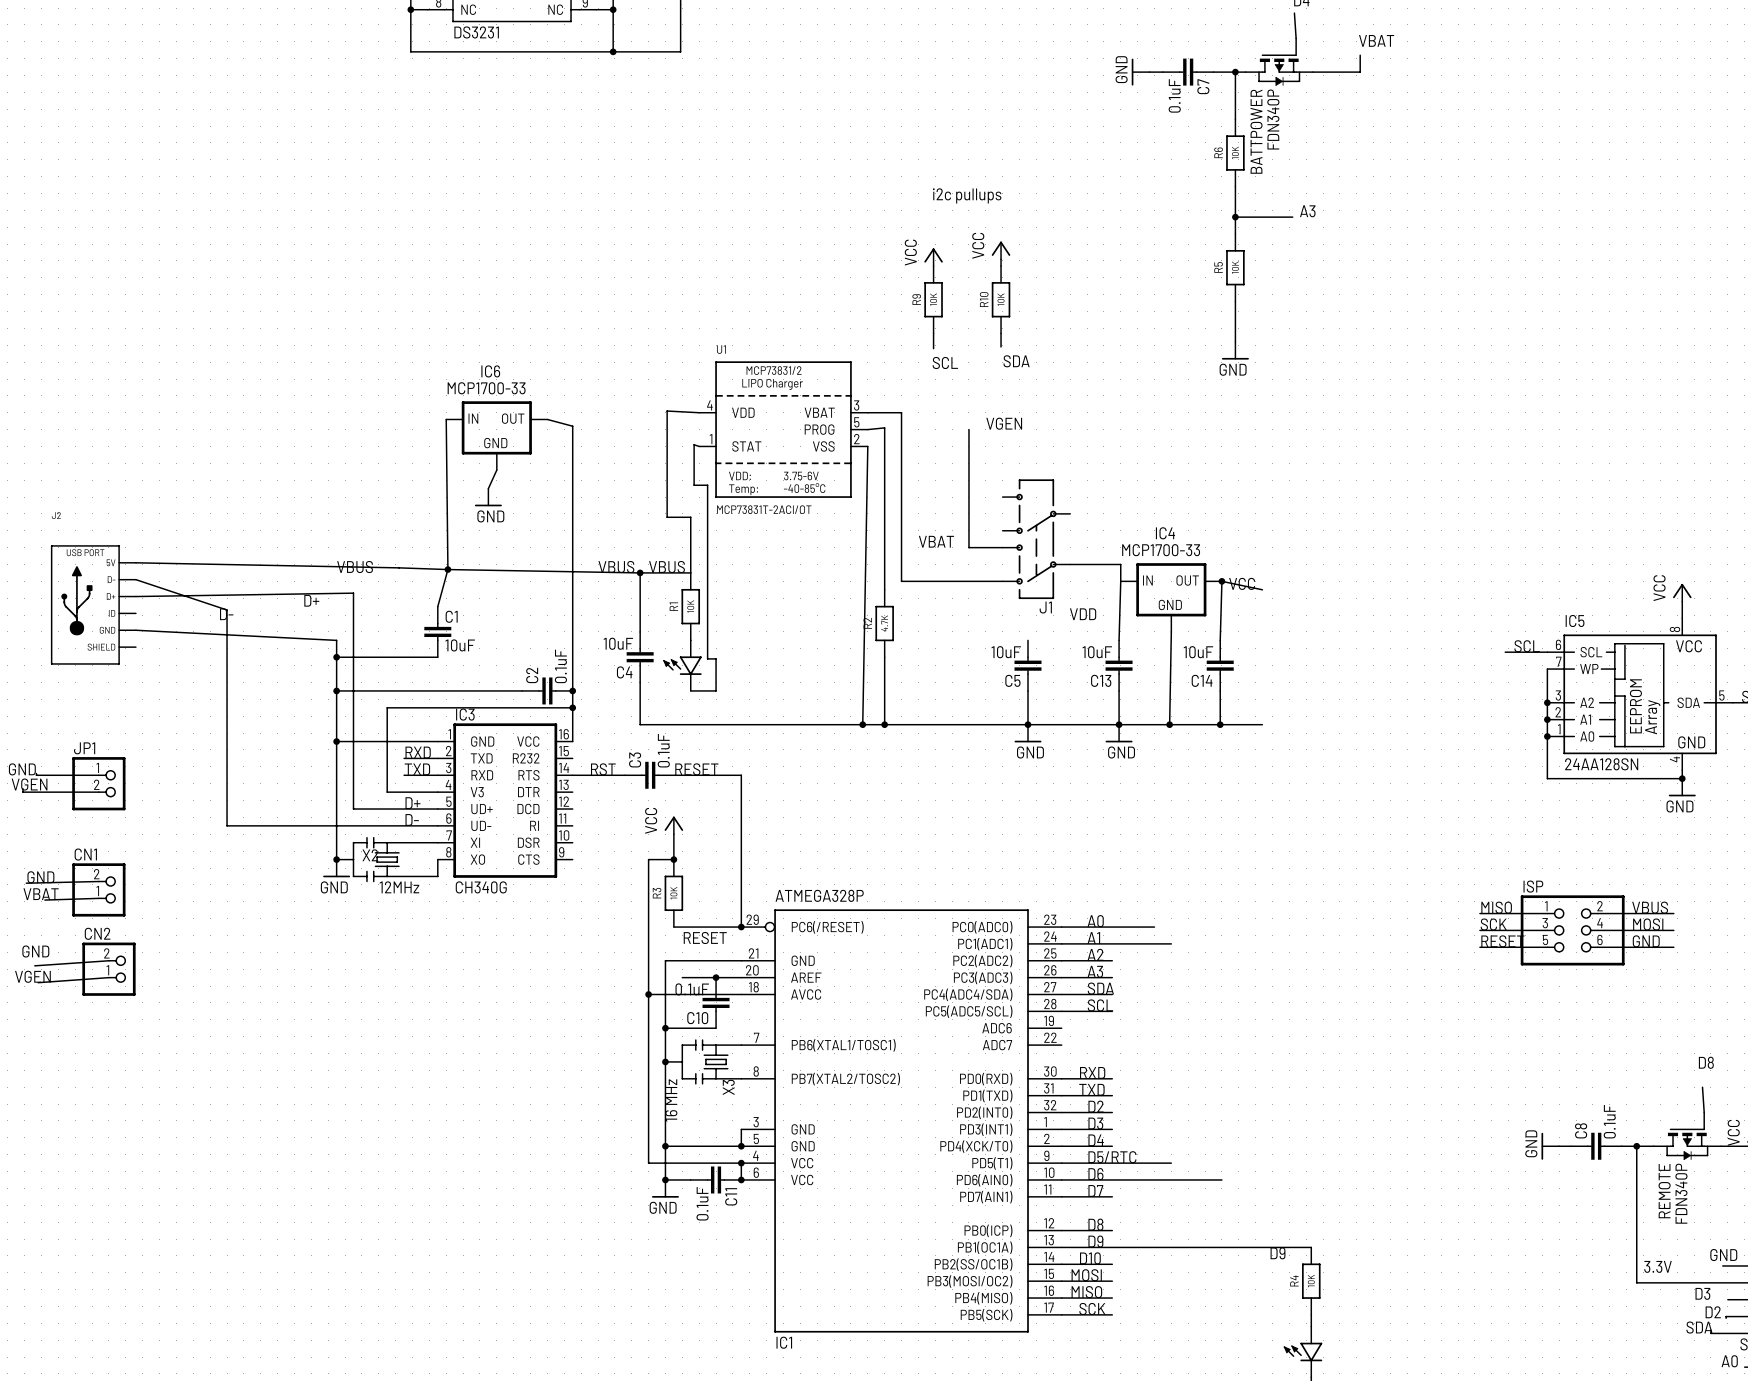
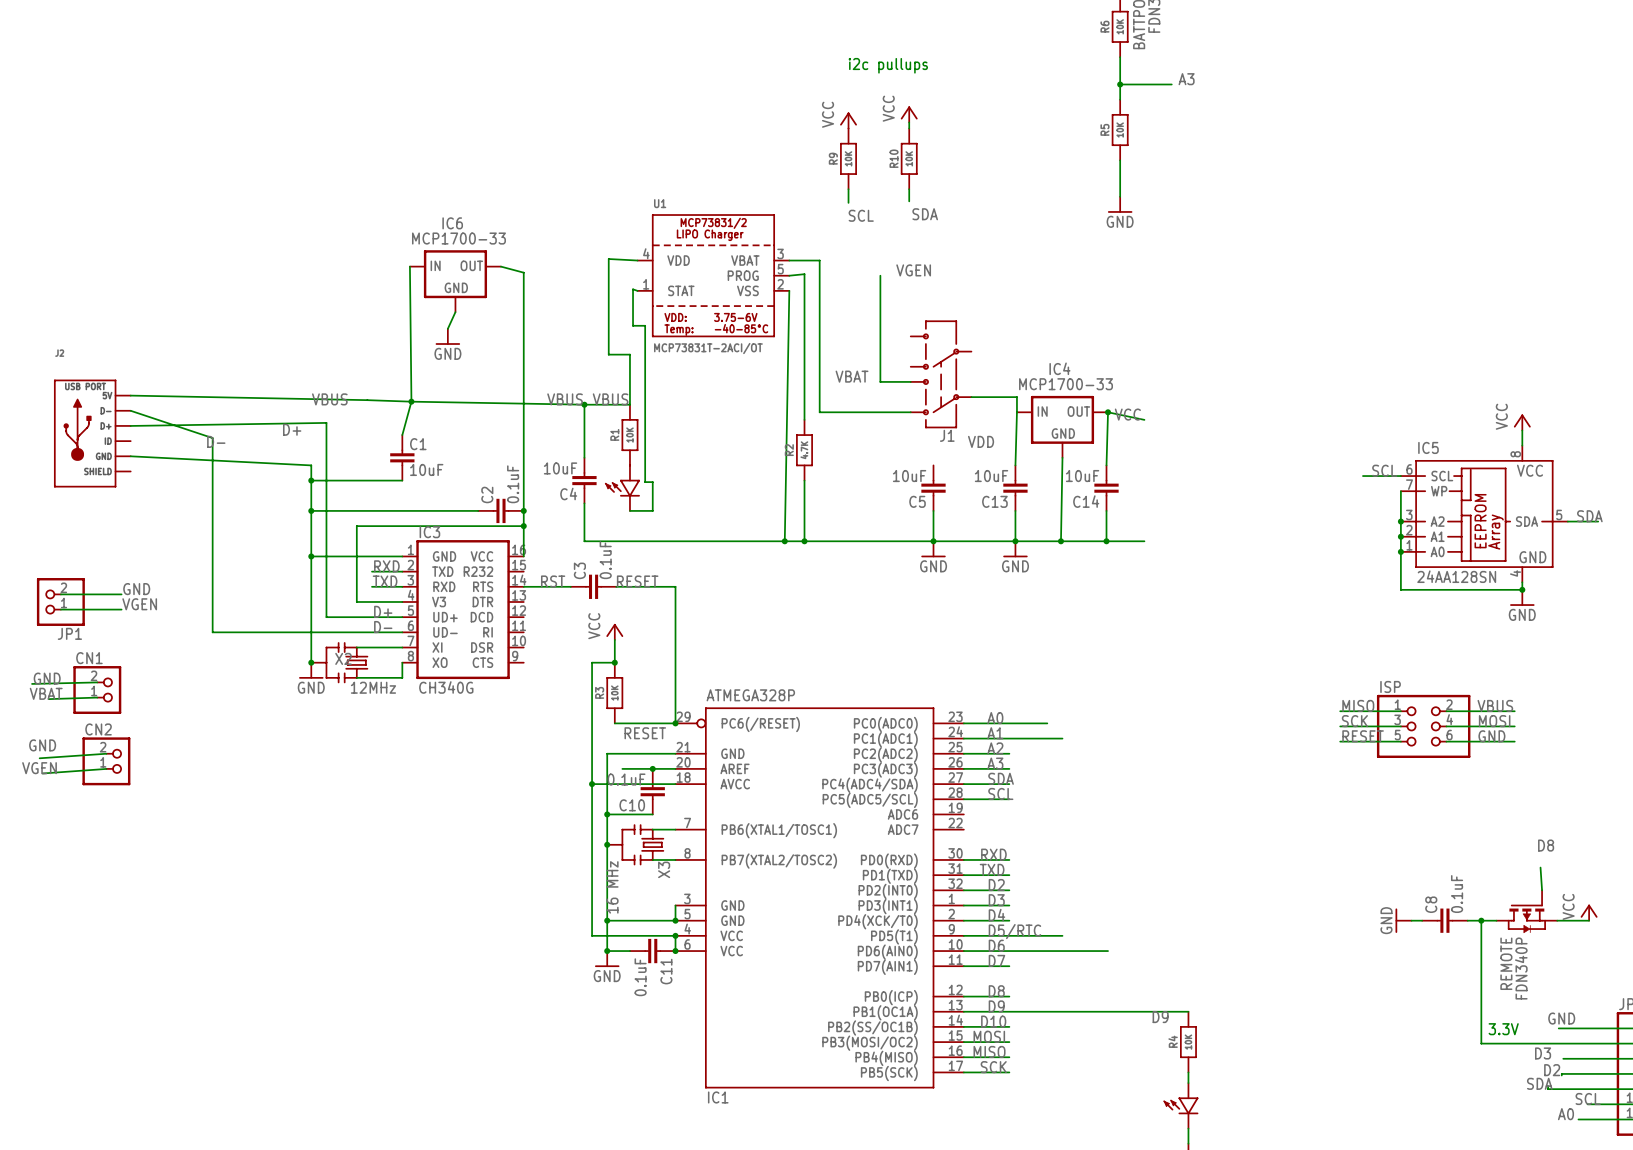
label position: GND (22, 769) -> GND (136, 589)
wire: (36, 773) (36, 775) (98, 775) -> none
wire: none -> (60, 594) (121, 594)
JP1 rotation: 0° (98, 783) -> 180° (60, 601)
JP1 position: (98, 783) -> (60, 601)
label position: VGEN (29, 784) -> VGEN (139, 604)
wire: (22, 788) (22, 792) (98, 792) -> none
wire: none -> (60, 609) (121, 609)

